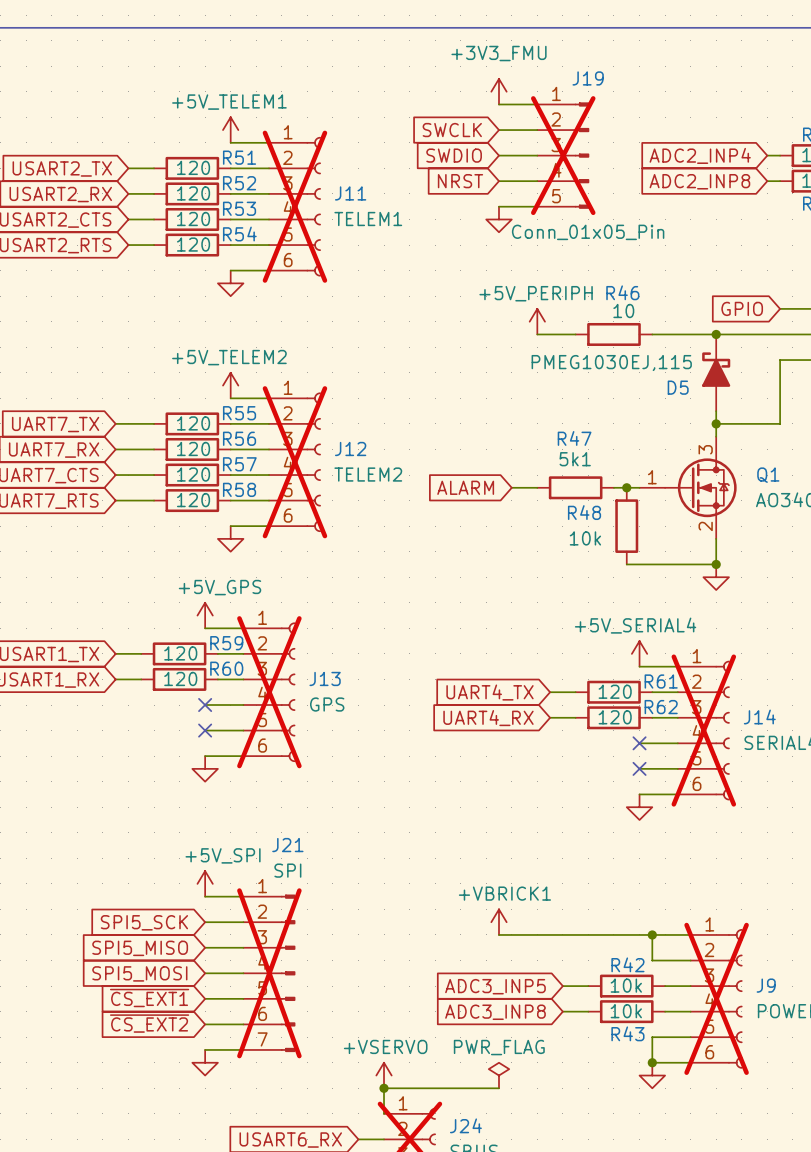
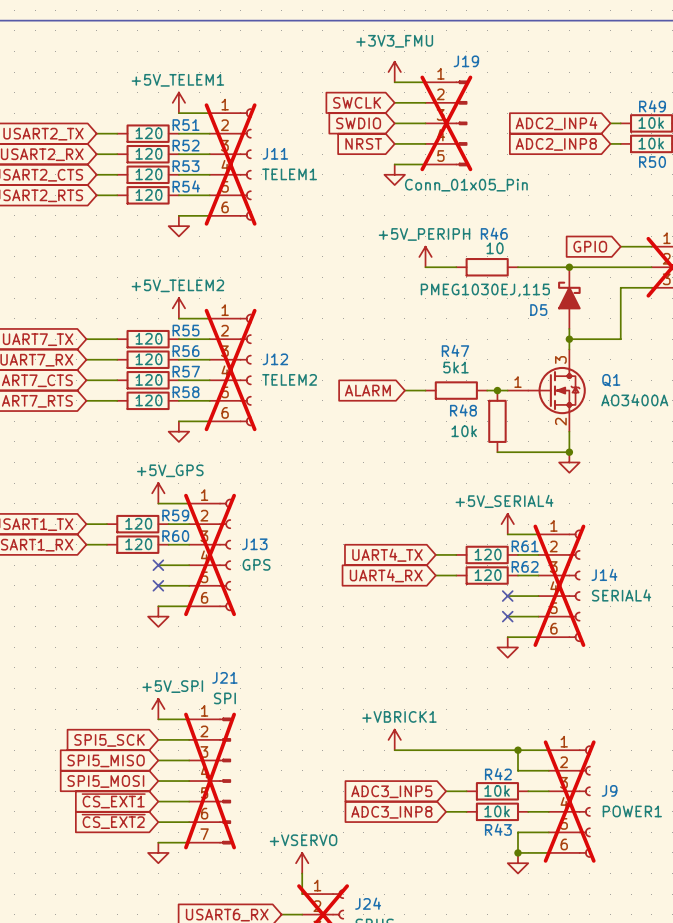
power symbol: PWR_FLAG (498, 1075) -> none
wire: (384, 1088) (498, 1088) -> none
junction: (384, 1088) -> none

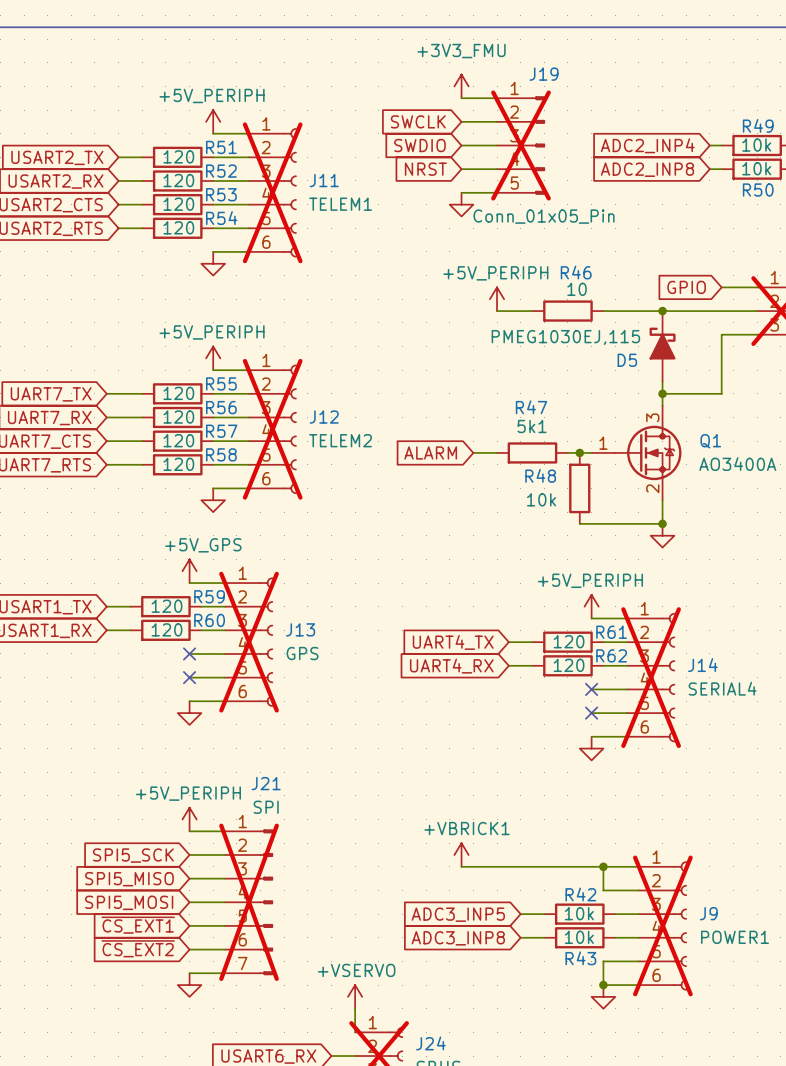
power symbol: +5V_TELEM1 (178, 102) -> +5V_PERIPH (213, 121)
power symbol: +5V_TELEM2 (178, 308) -> +5V_PERIPH (213, 358)
power symbol: +5V_SERIAL4 (507, 524) -> +5V_PERIPH (591, 606)
power symbol: +5V_SPI (158, 709) -> +5V_PERIPH (189, 819)

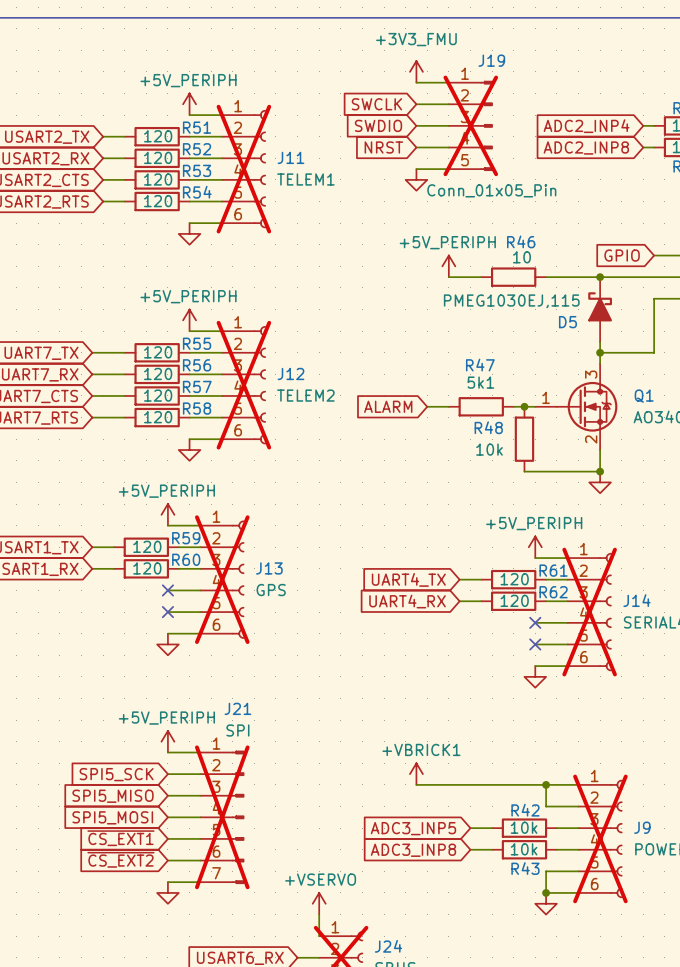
power symbol: +5V_GPS (189, 571) -> +5V_PERIPH (167, 514)

